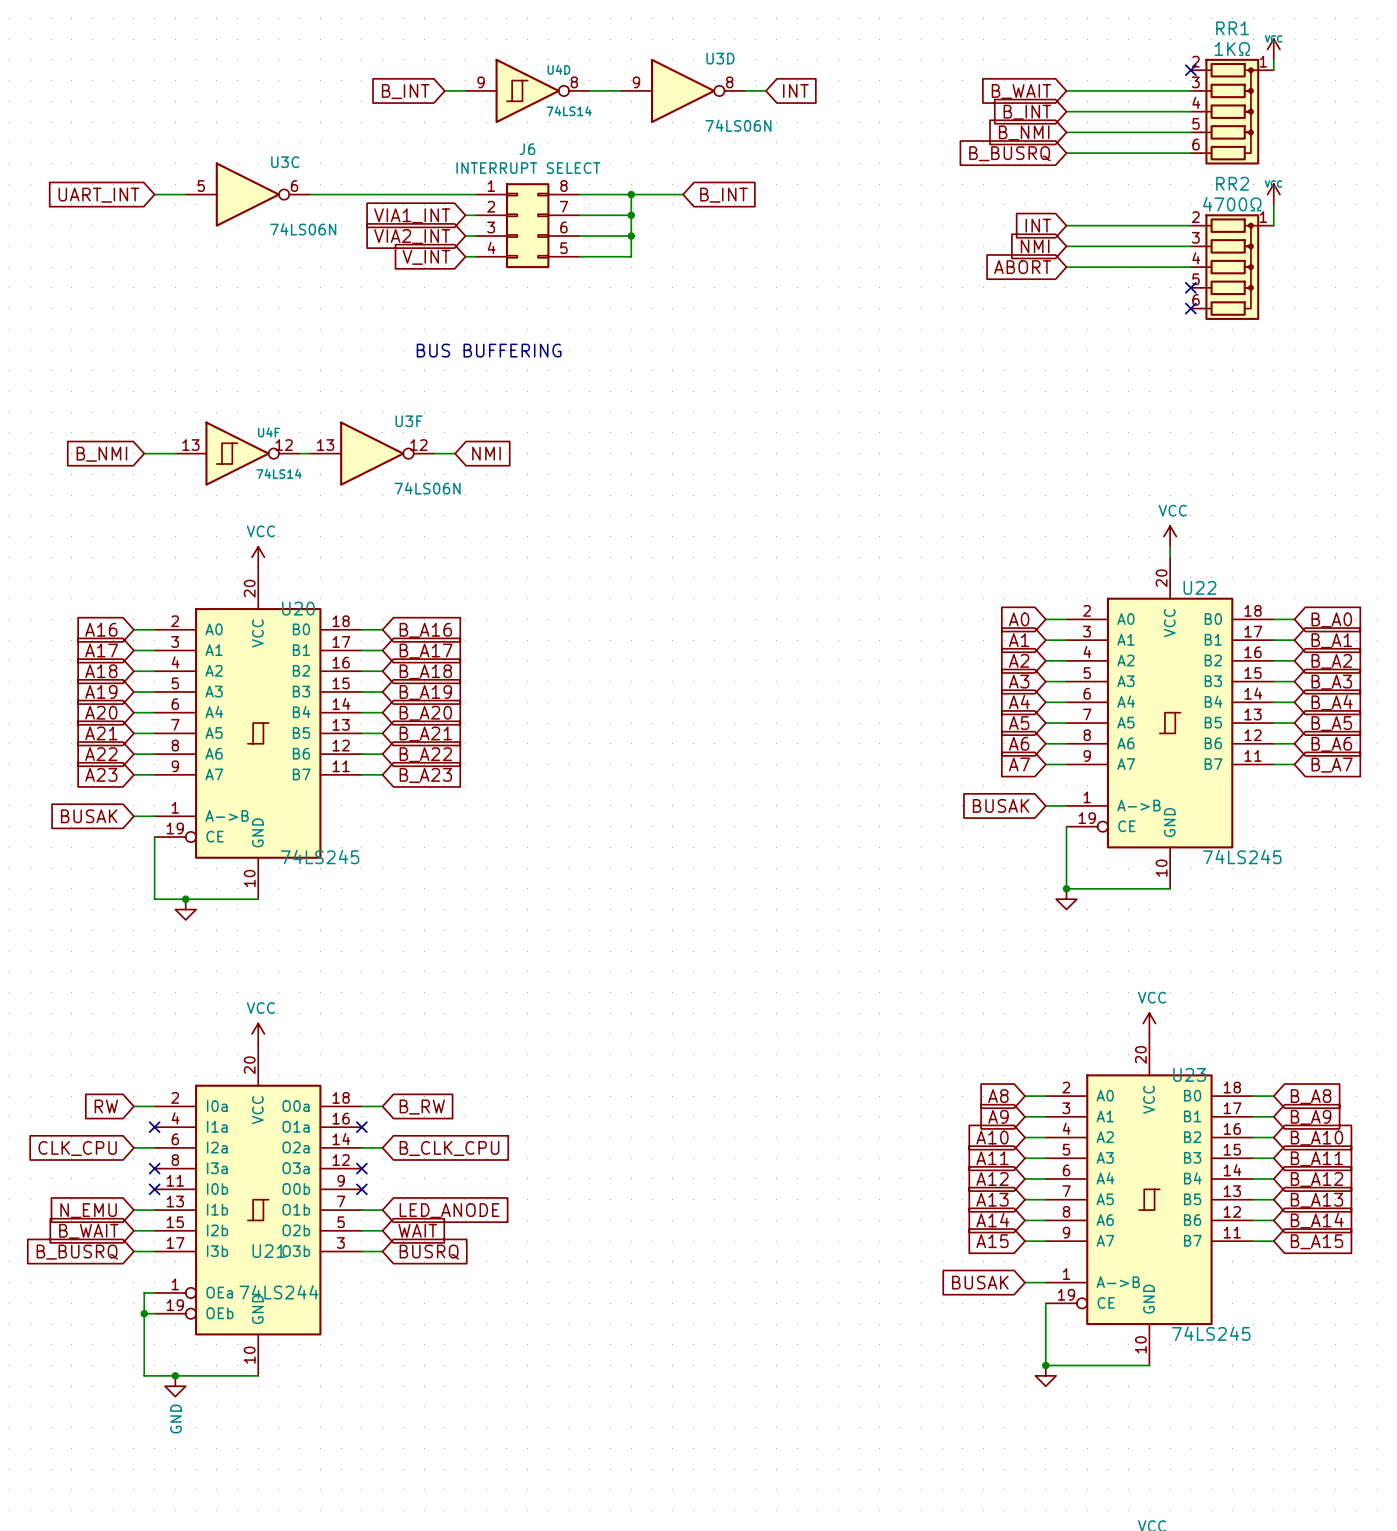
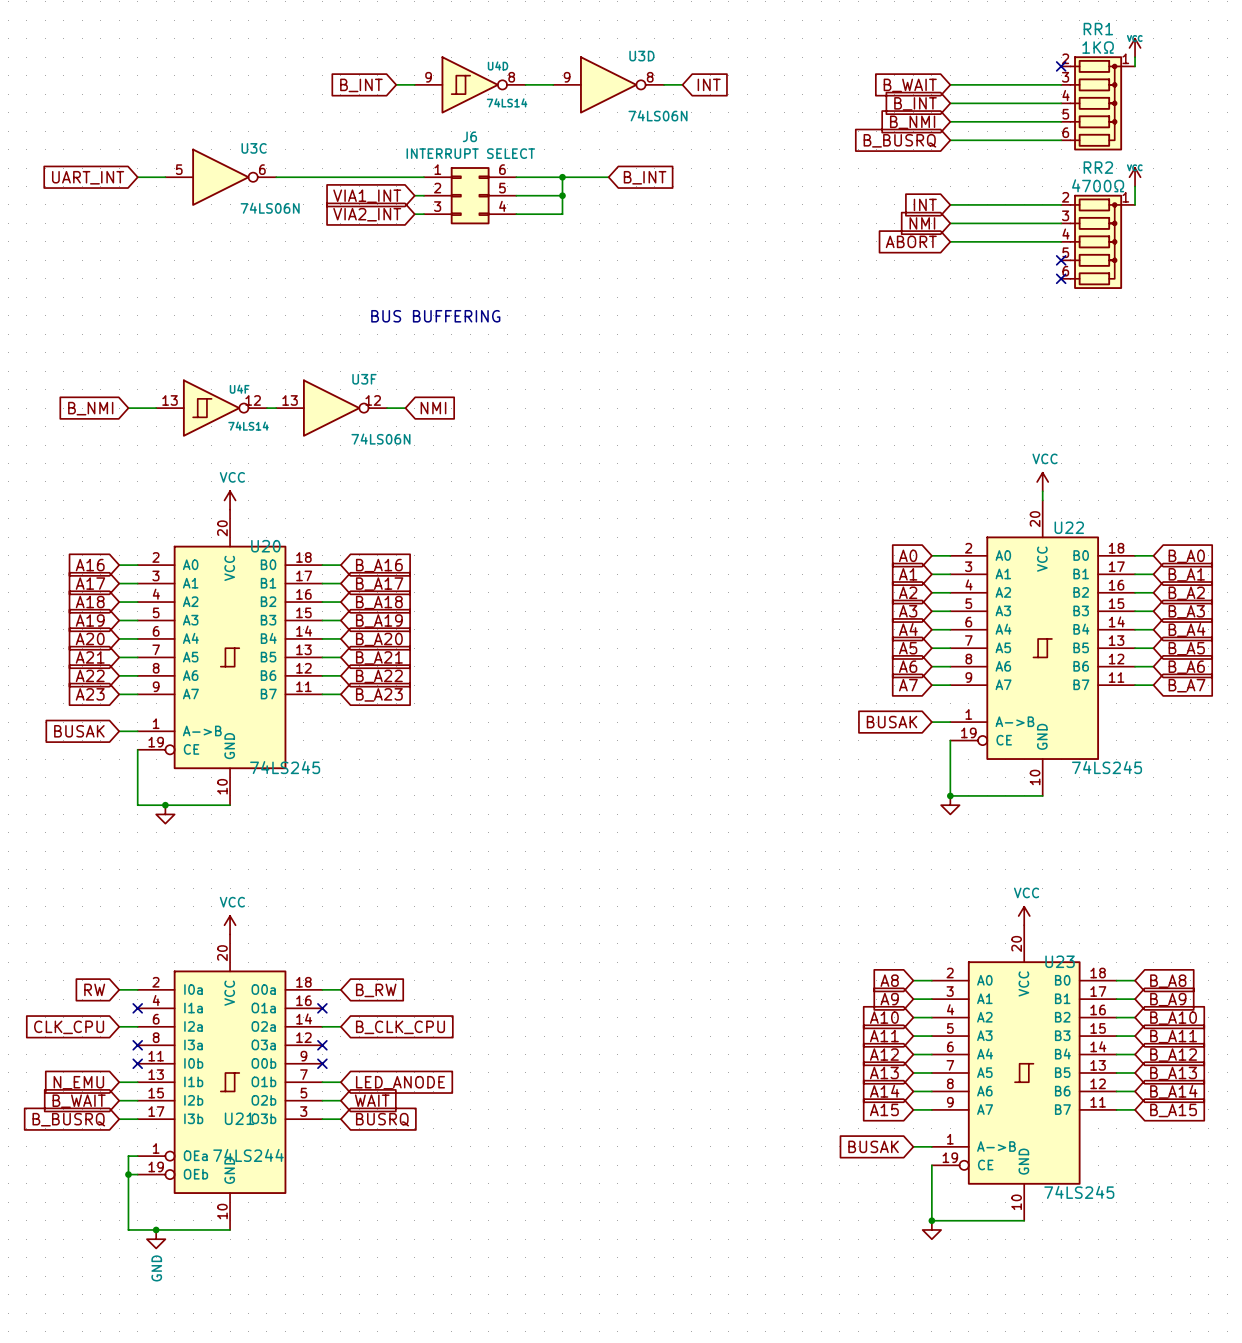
J6 symbol: [475, 183, 580, 269] -> [423, 167, 517, 225]
wire: (631, 236) (631, 256) (579, 256) -> none
junction: (631, 236) -> none
wire: (465, 256) (475, 256) -> none
global label: V_INT (426, 257) -> none

